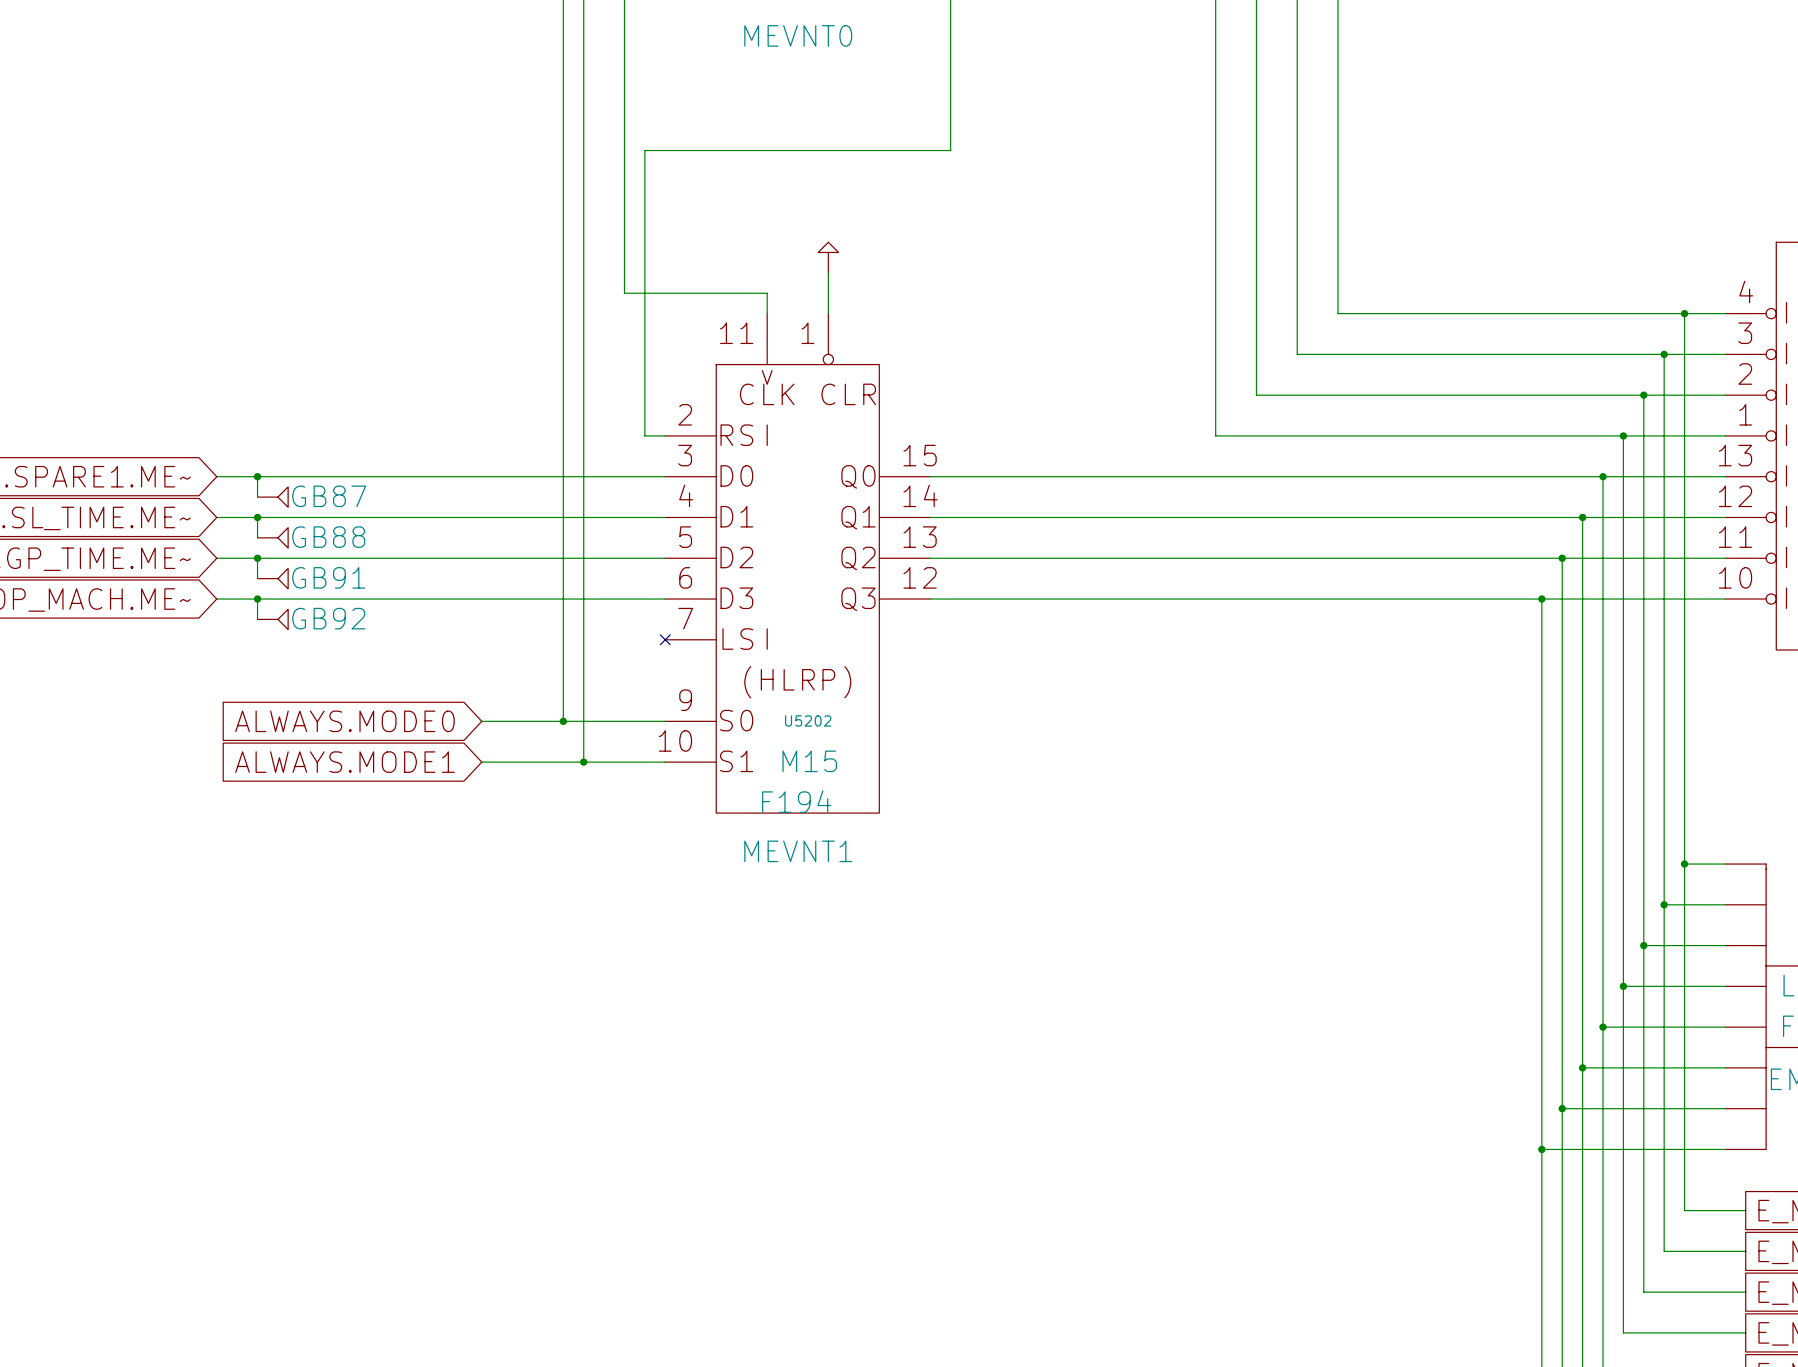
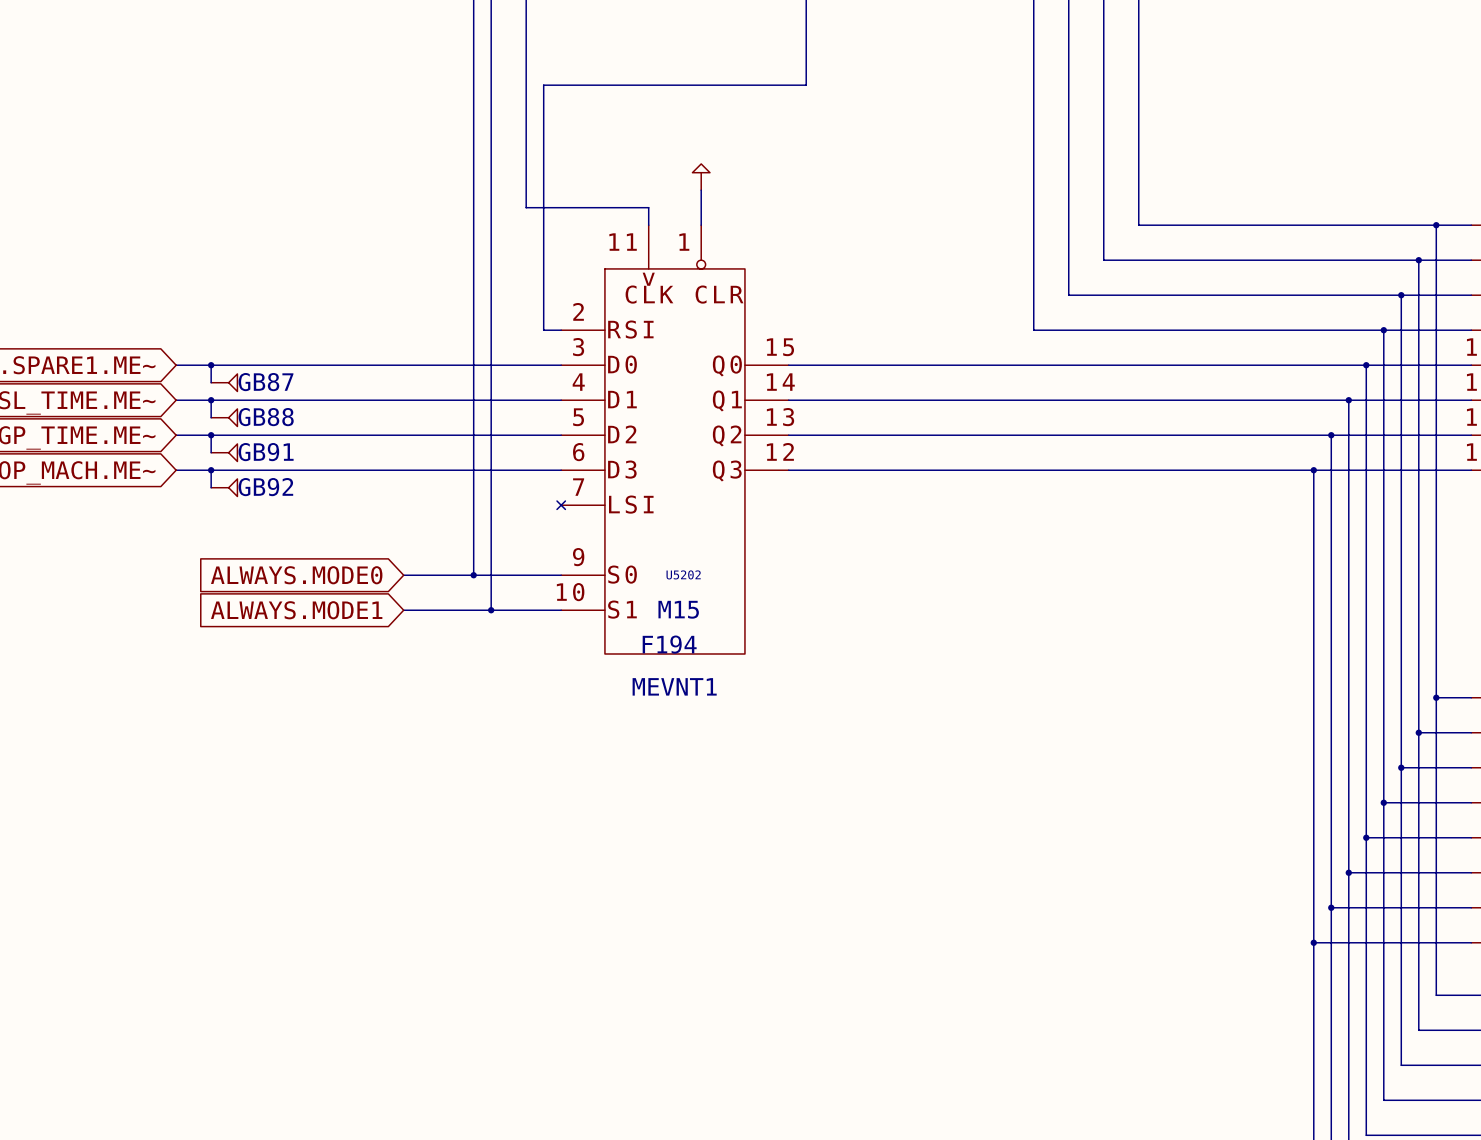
U5202 text: H (767, 679) -> none
U5202 text: L (789, 679) -> none
U5202 text: R (808, 679) -> none
U5202 text: P (828, 679) -> none
U5202 text: ( (747, 682) -> none
U5202 text: ) (847, 682) -> none

